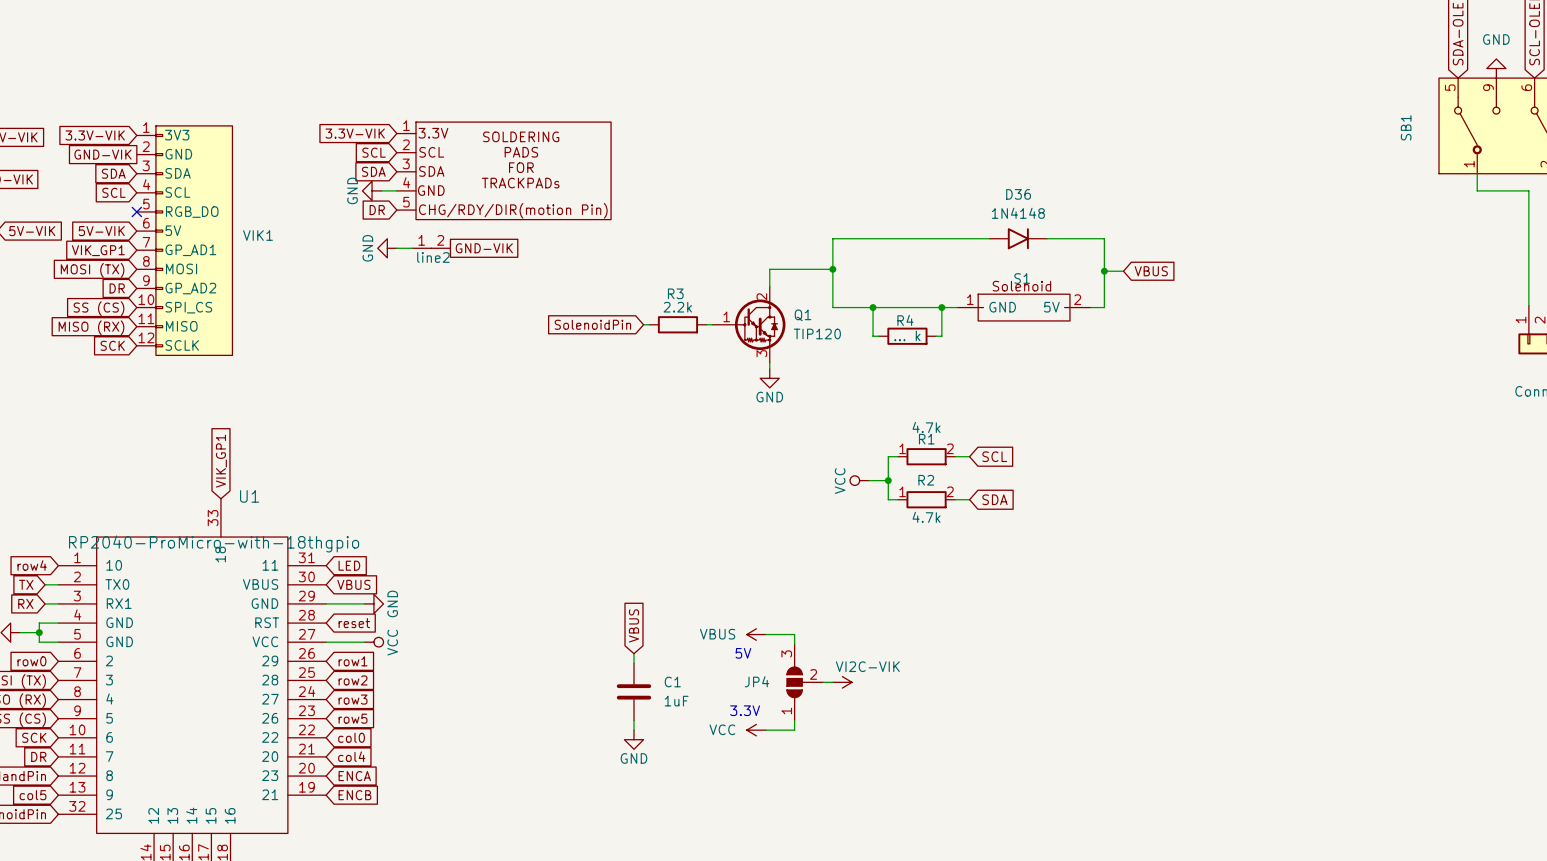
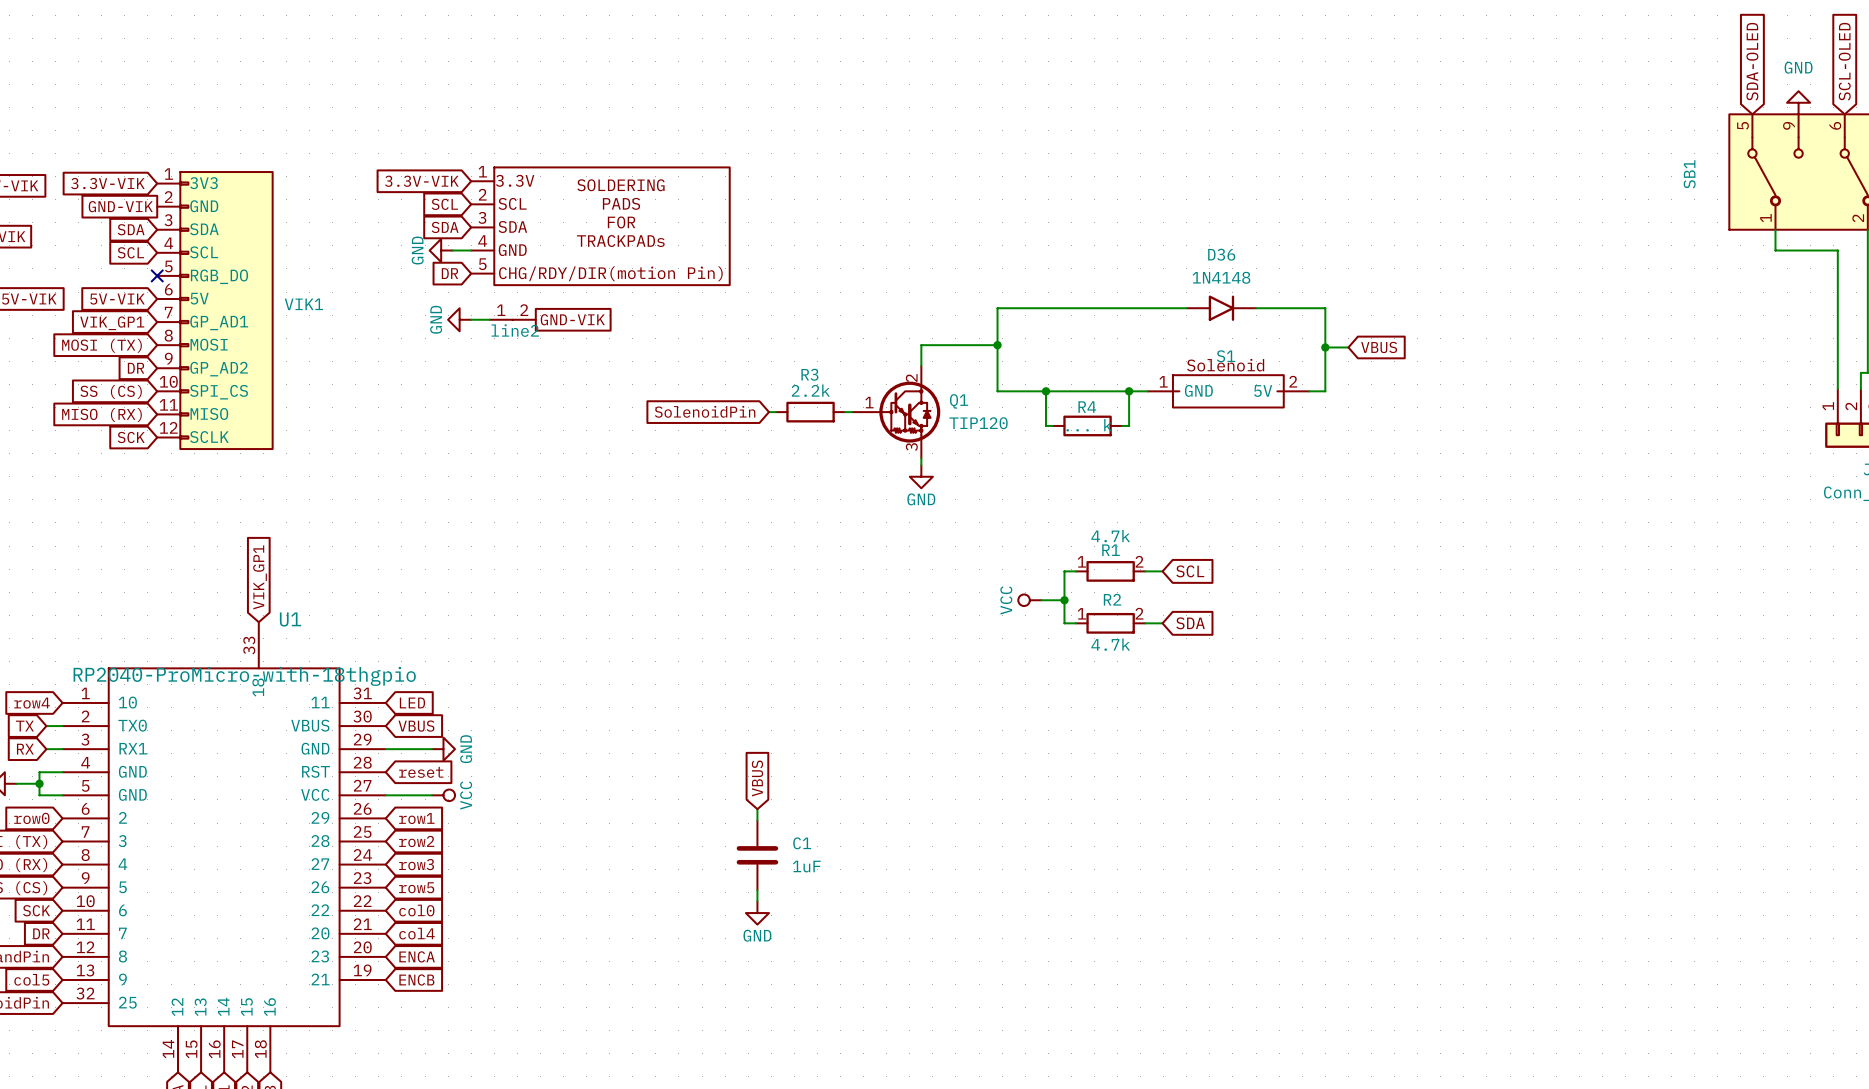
power symbol: VBUS (756, 634) -> none
wire: (765, 634) (794, 634) (794, 644) -> none
text: 5V (743, 653) -> none
JP4: (805, 682) -> none
wire: (823, 682) (832, 682) -> none
power symbol: VI2C-VIK (842, 682) -> none
text: 3.3V (745, 710) -> none
wire: (794, 720) (794, 730) (765, 730) -> none
power symbol: VCC (756, 730) -> none

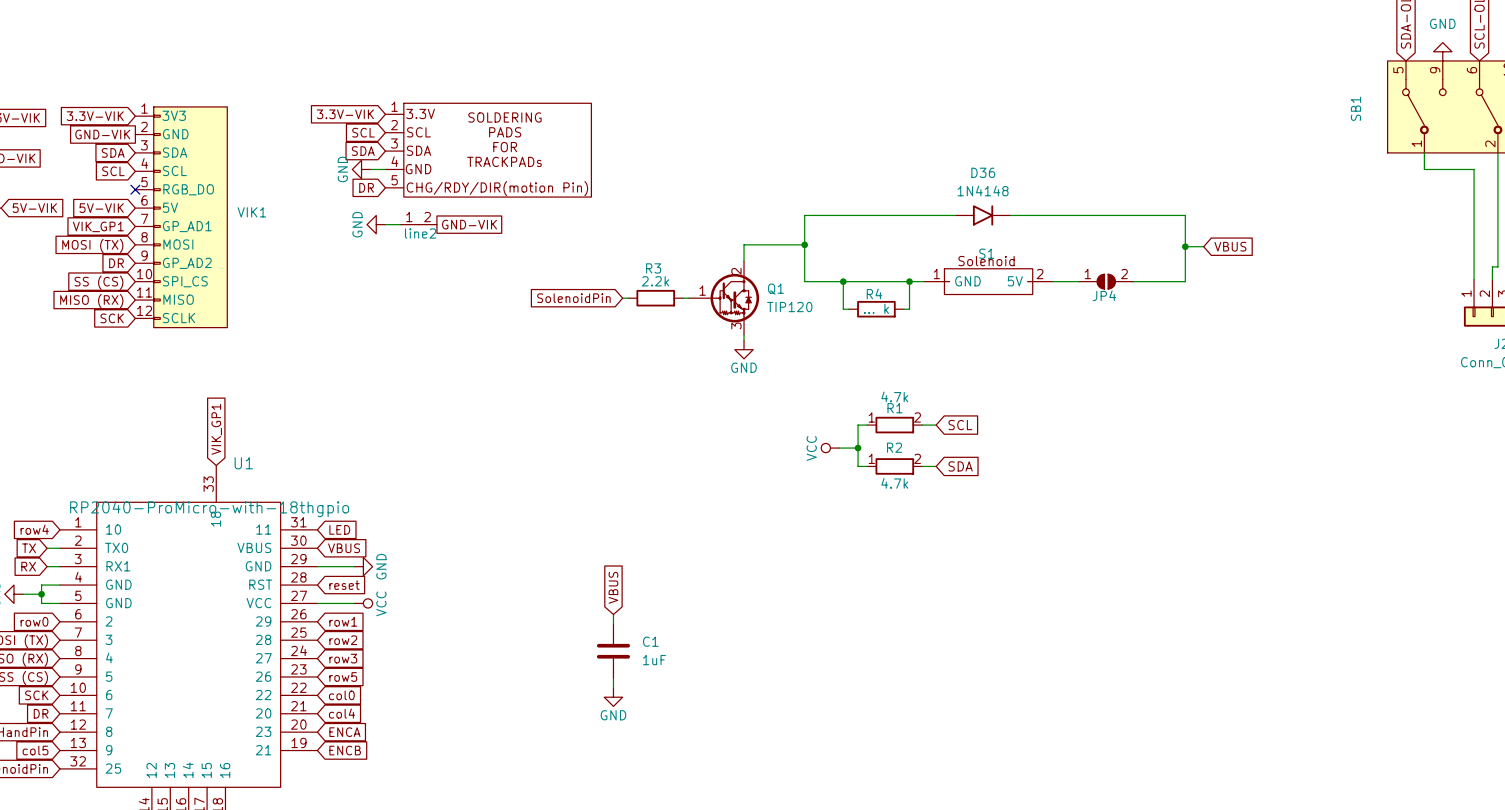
wire: (1325, 308) (1325, 391) -> (1078, 281) (1065, 281)
wire: none -> (1065, 215) (1185, 215) (1185, 281) (1133, 281)
wire: (1325, 347) (1348, 347) -> (1185, 246) (1203, 246)
junction: (1325, 347) -> none
global label position: VBUS (1379, 347) -> VBUS (1230, 246)
junction: none -> (1185, 246)
JP4: none -> (1106, 281)

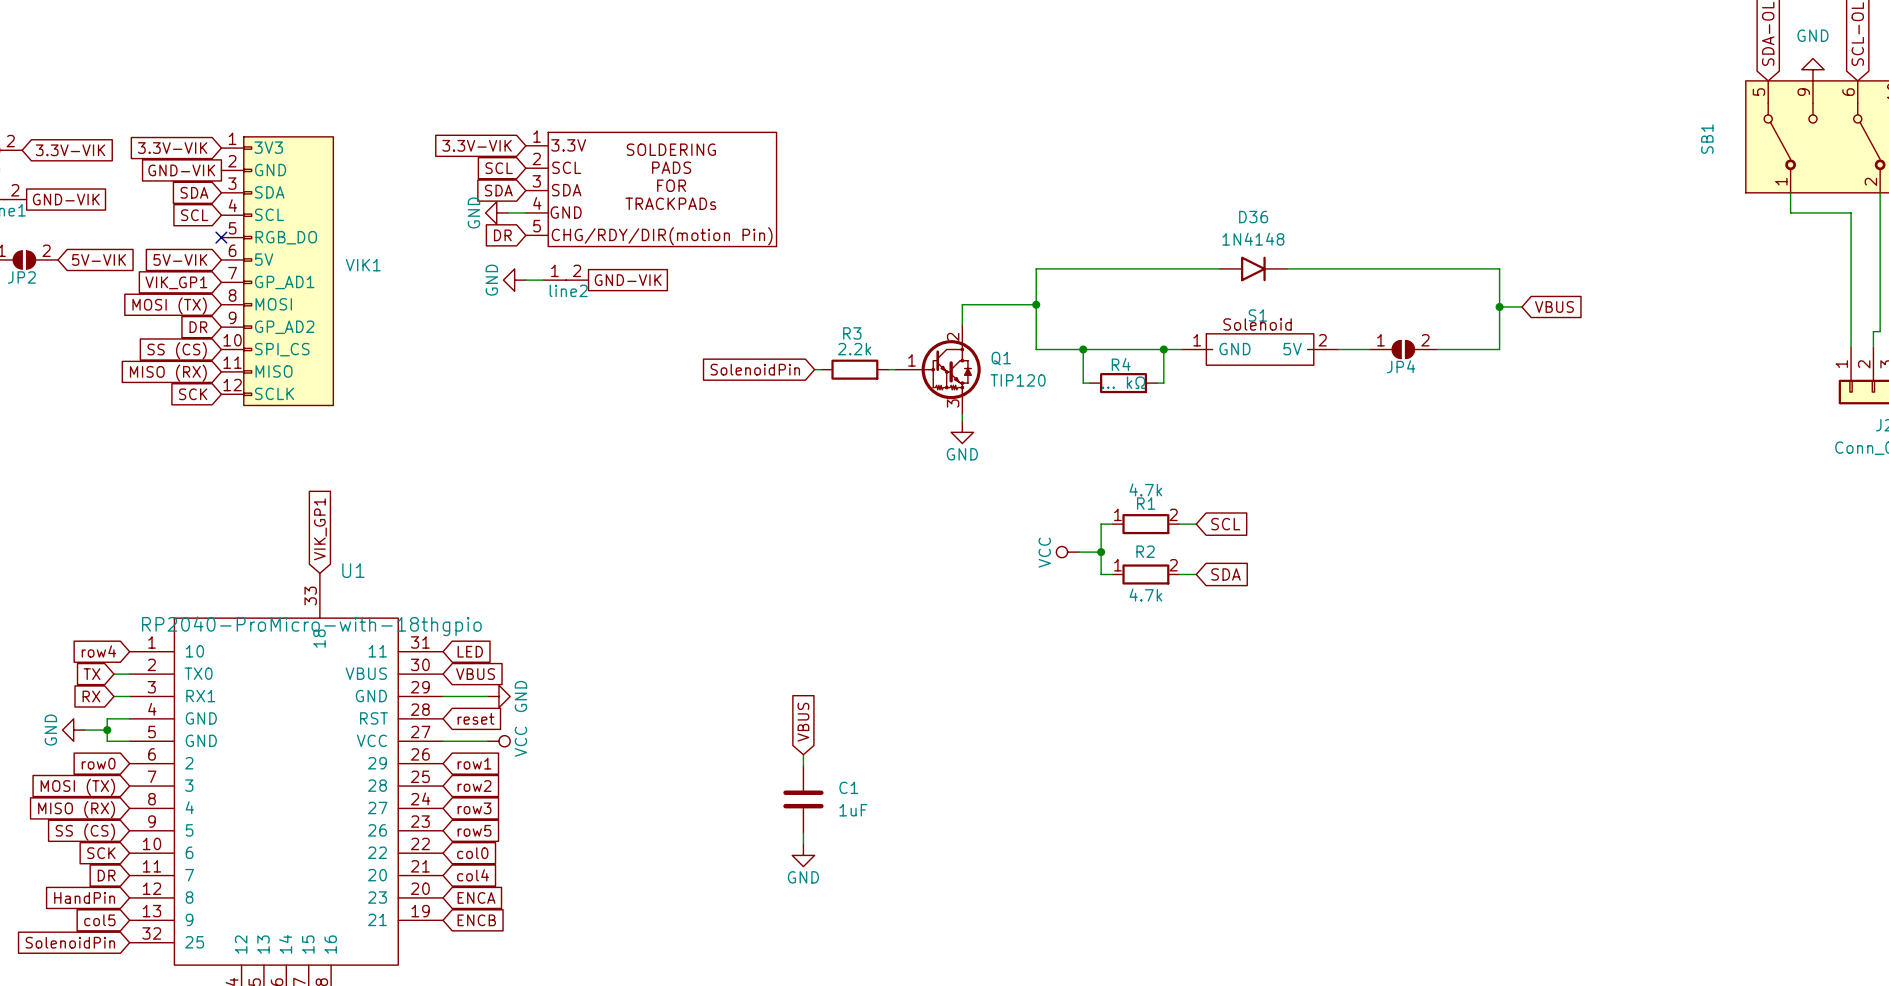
R4 value: ... k (876, 308) -> ... kΩ (1123, 382)

